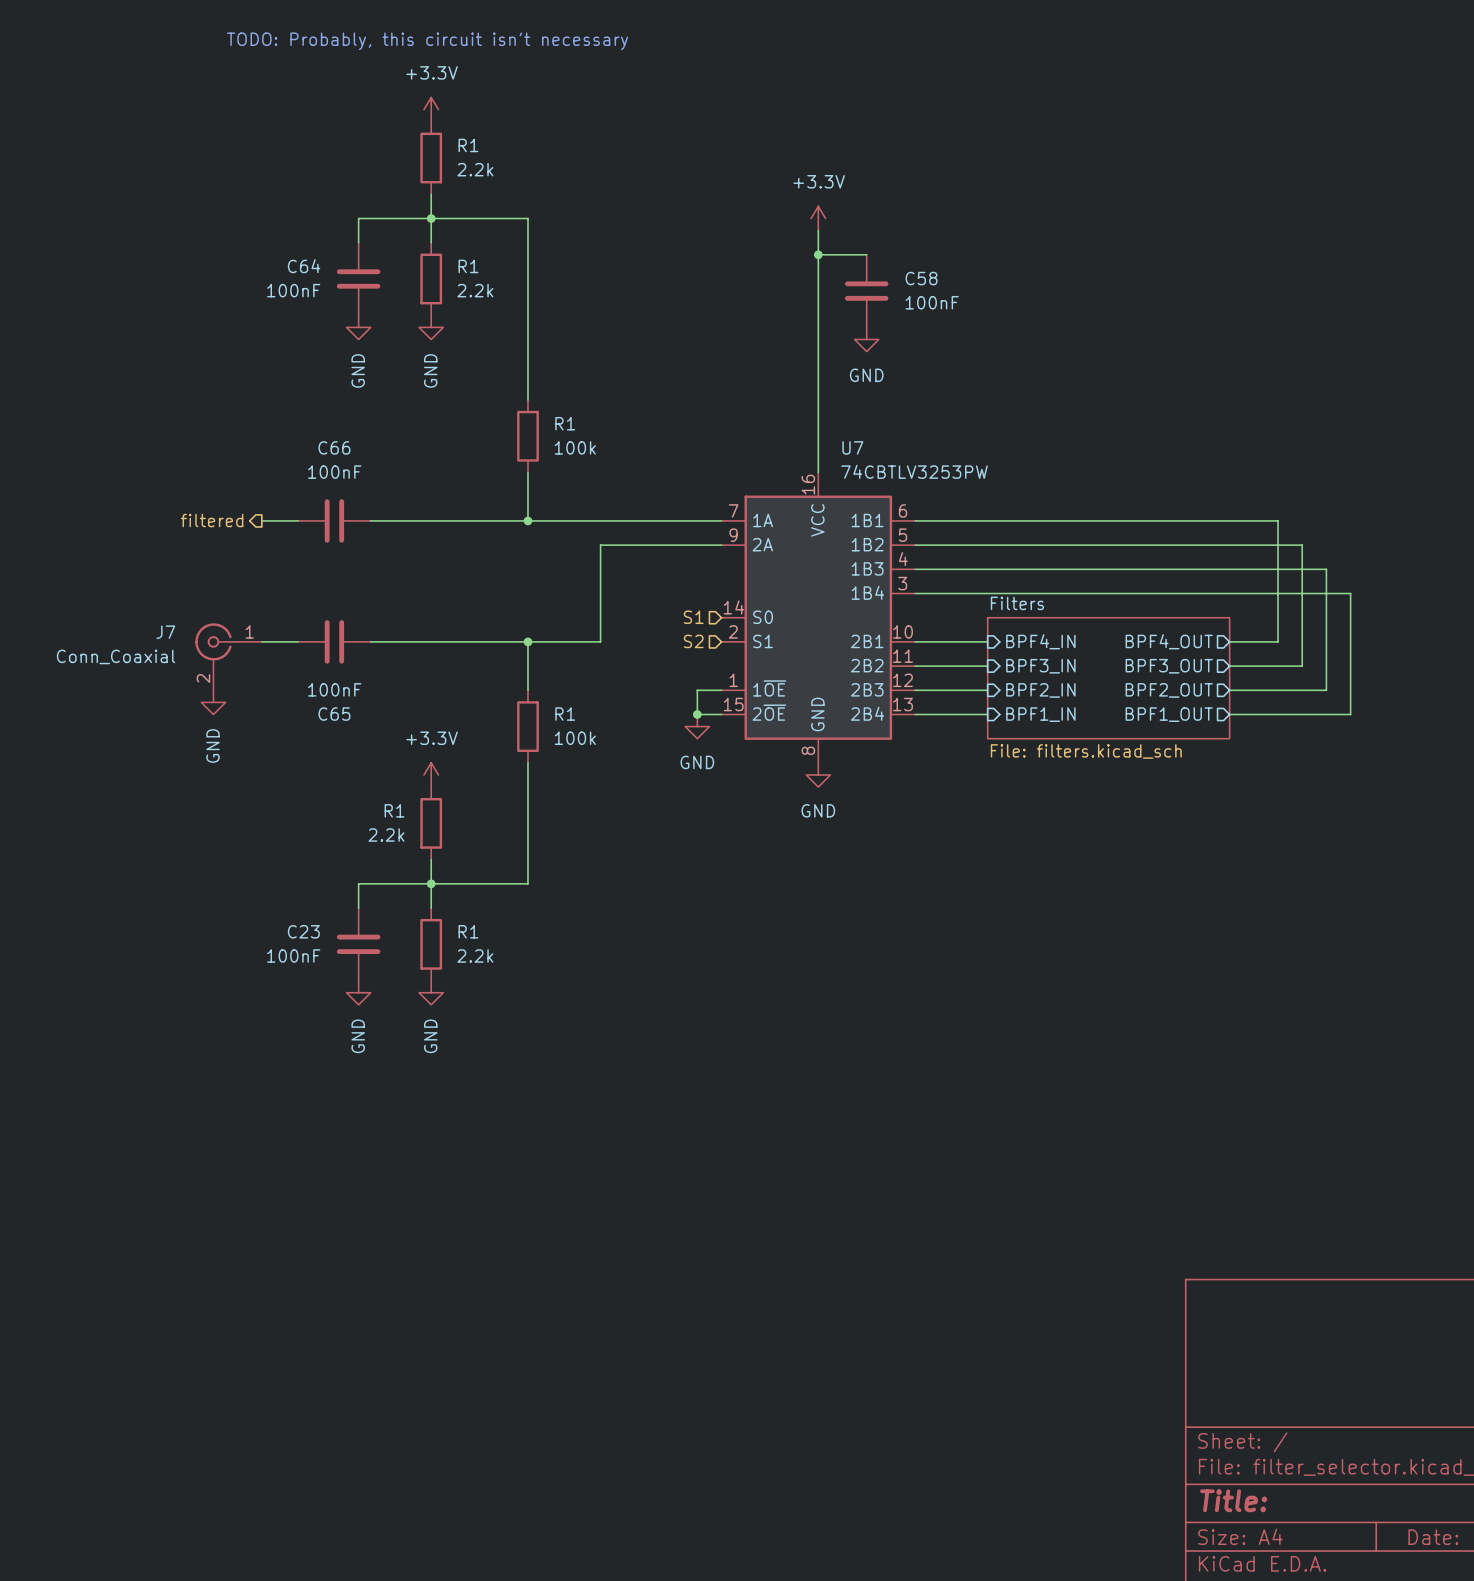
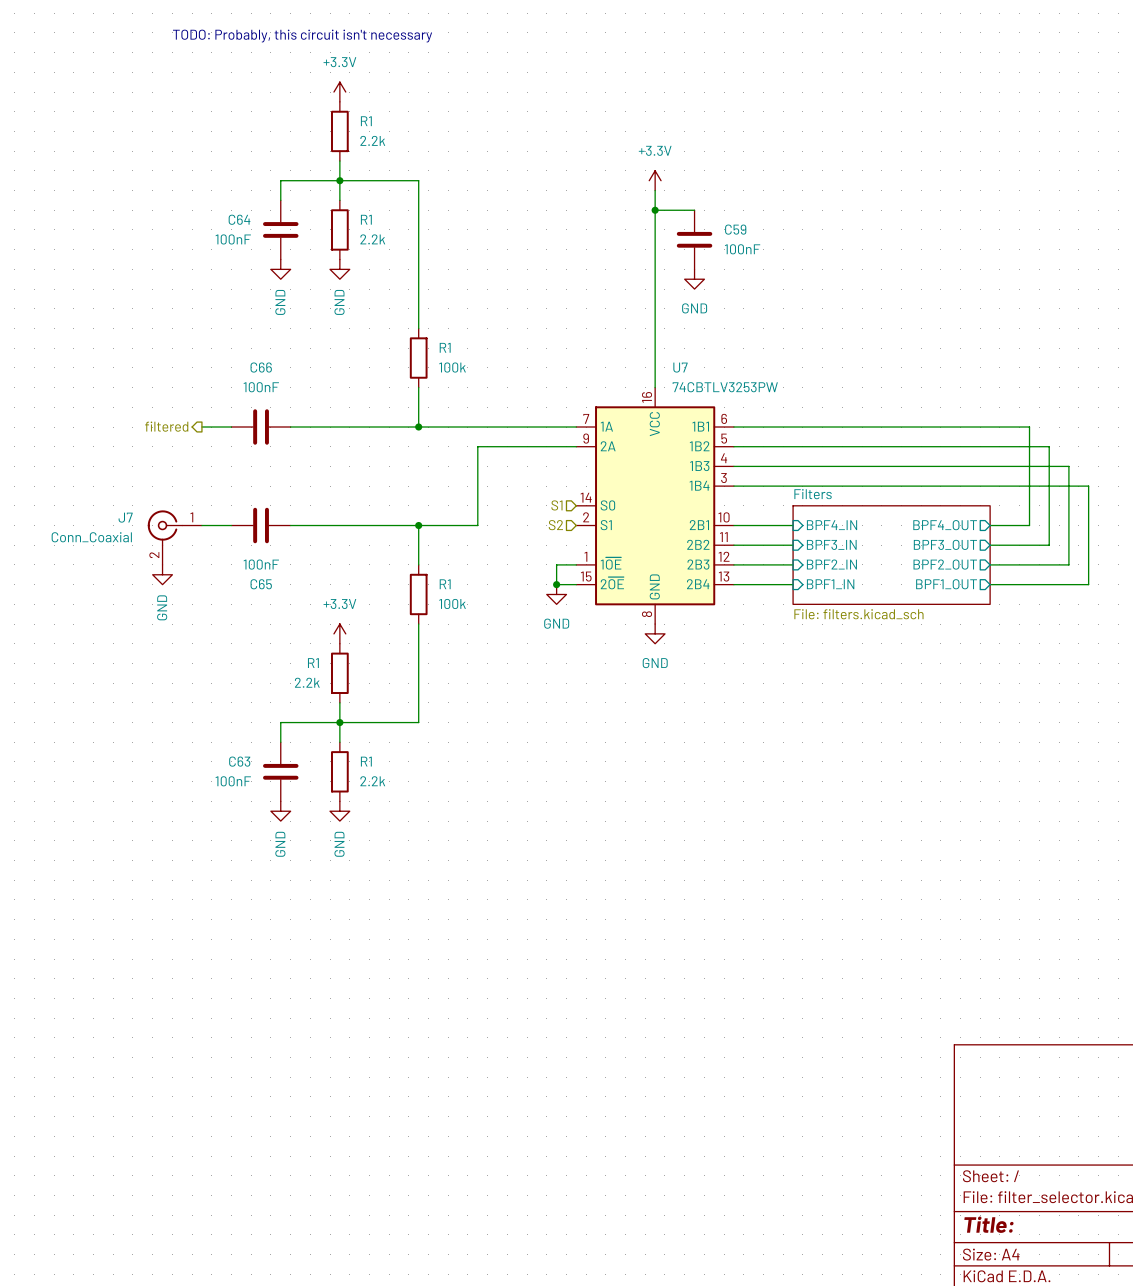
C58 name: C58 (921, 278) -> C59 (735, 229)
C23 name: C23 (303, 931) -> C63 (239, 761)

